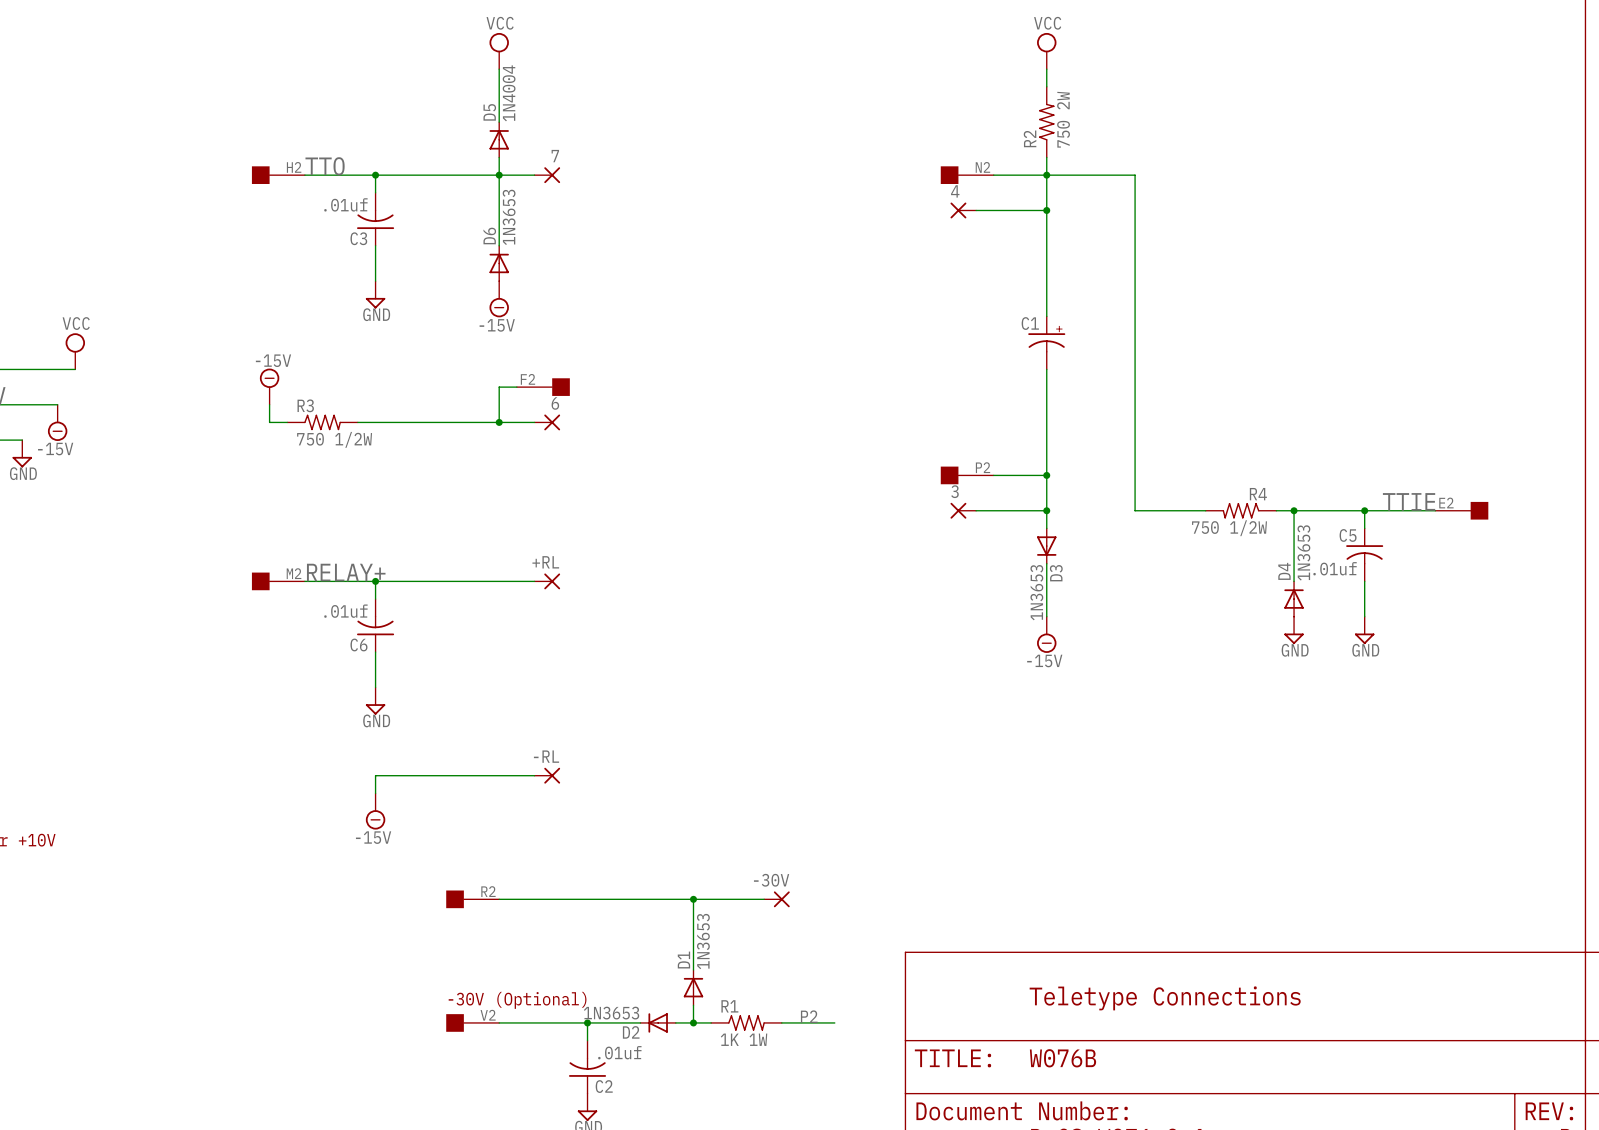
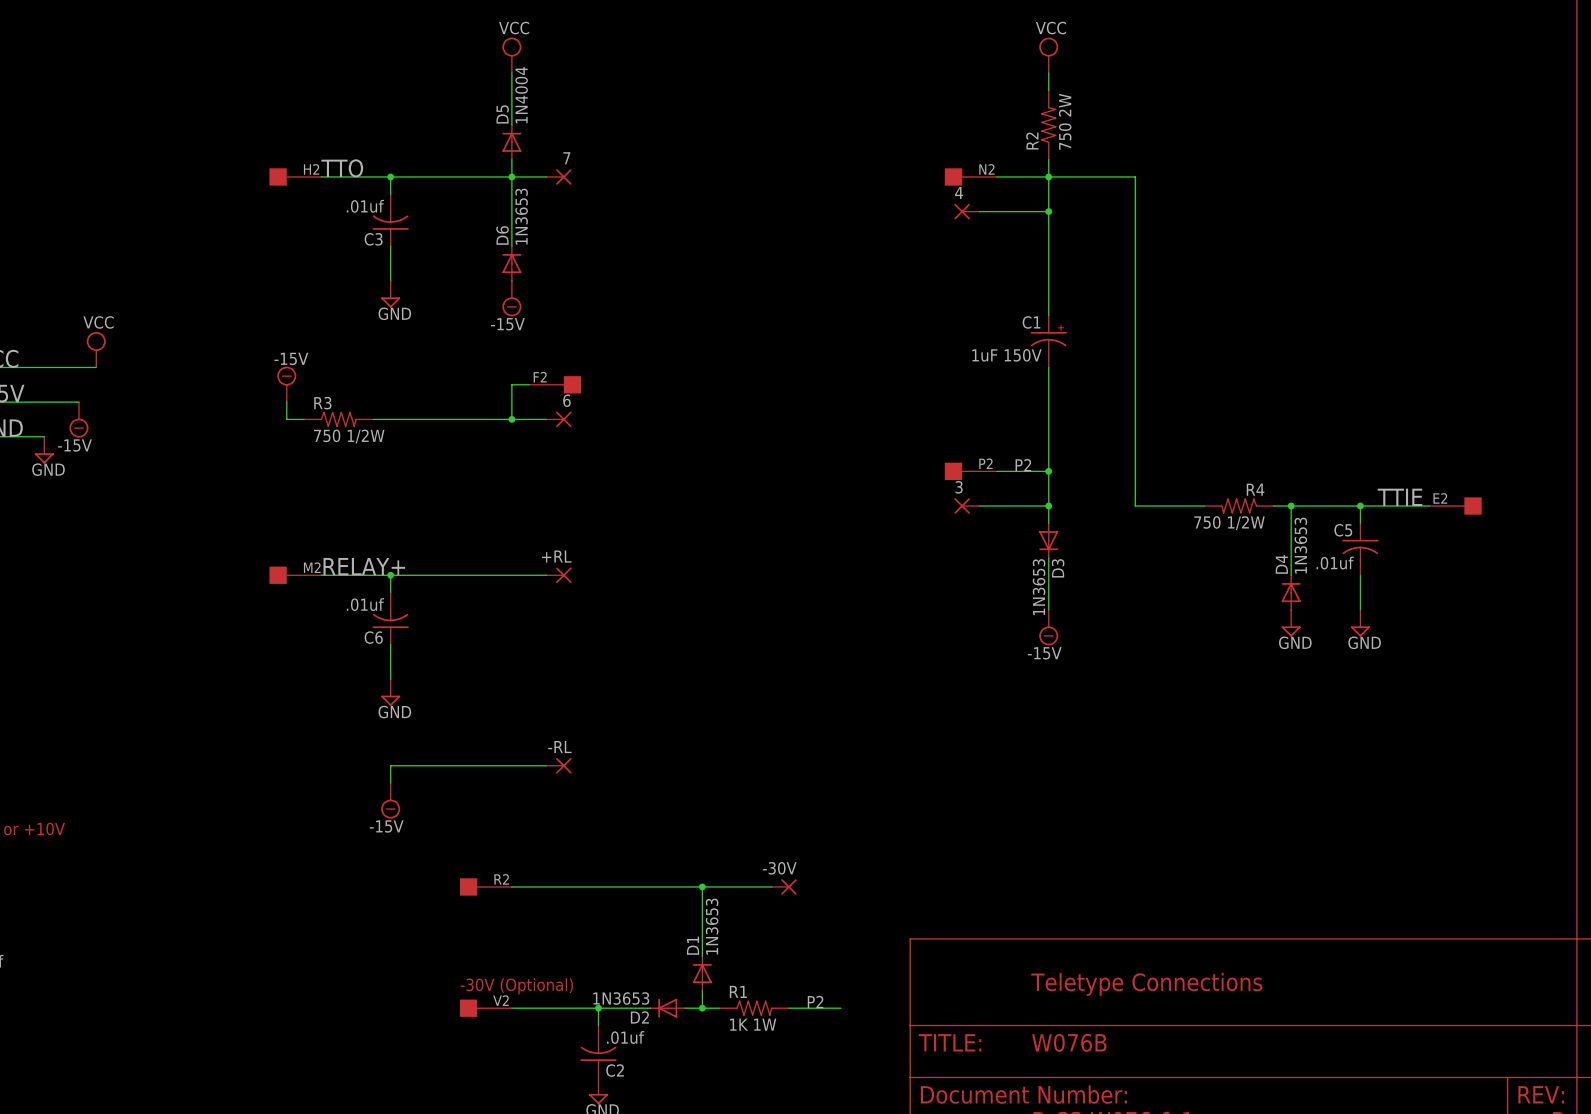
C1 value: none -> 1uF 150V (1006, 355)
label: none -> P2 (1023, 465)

